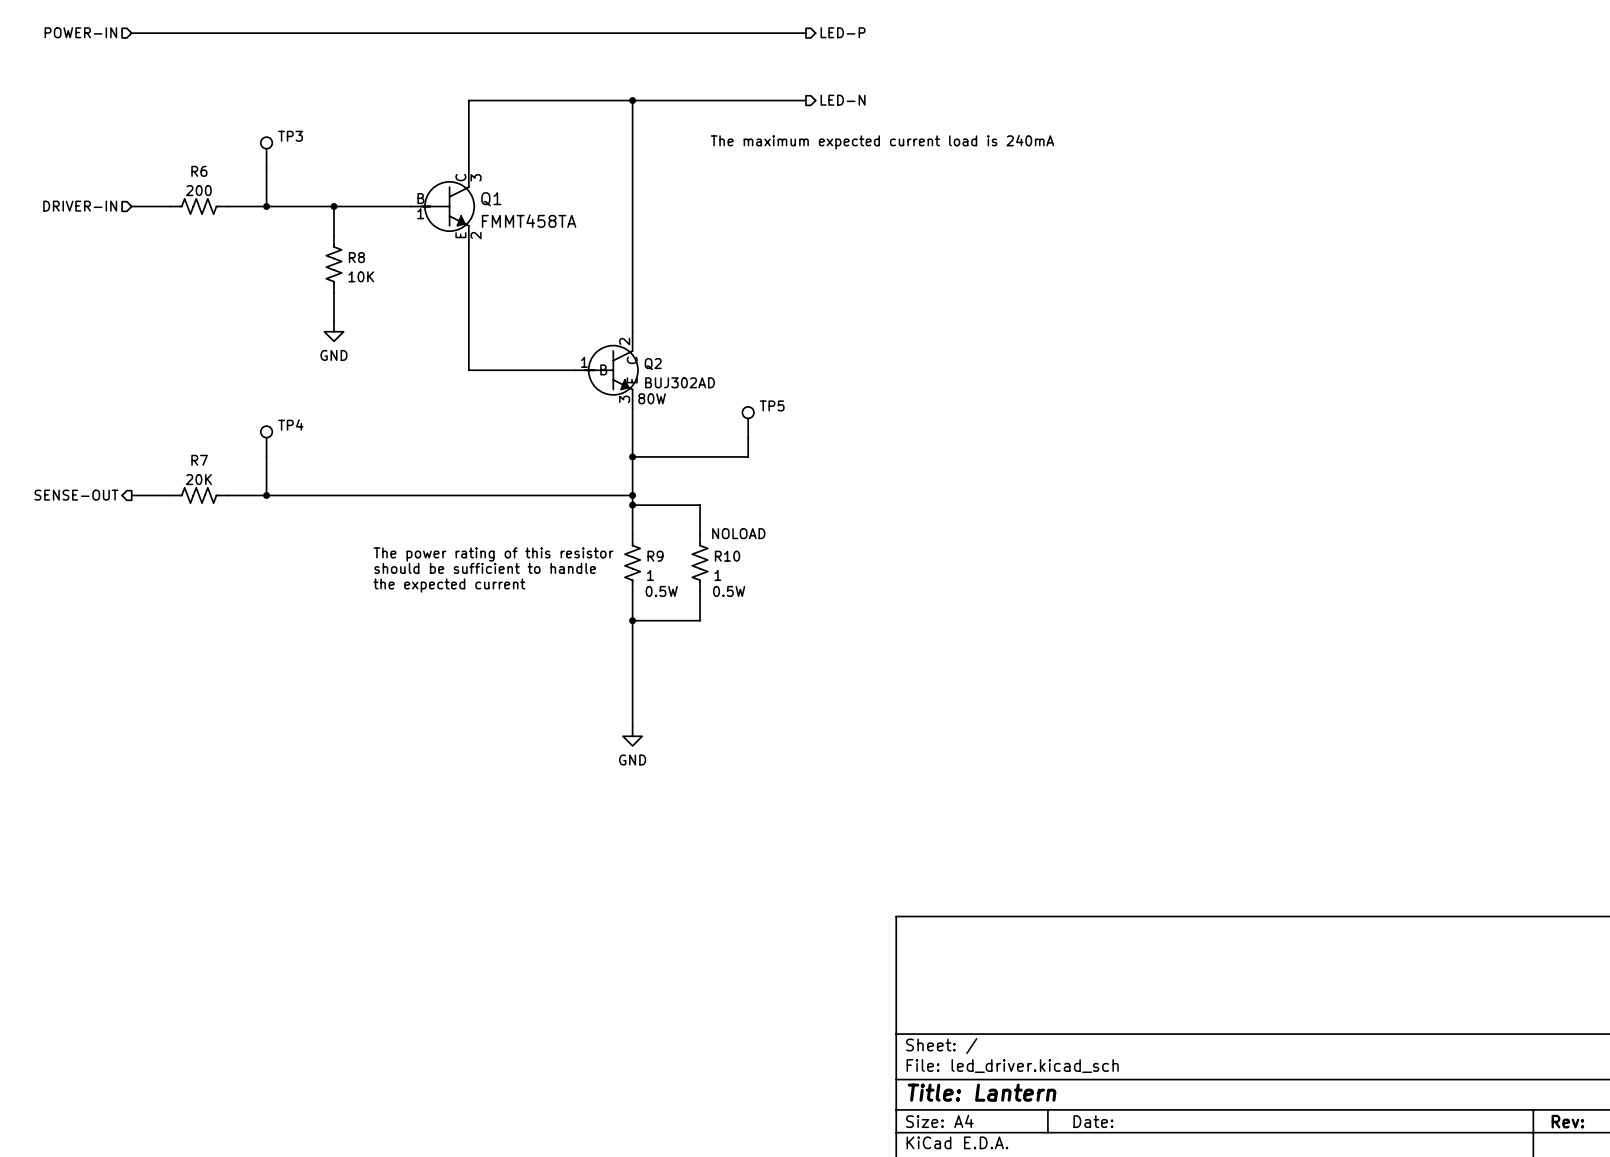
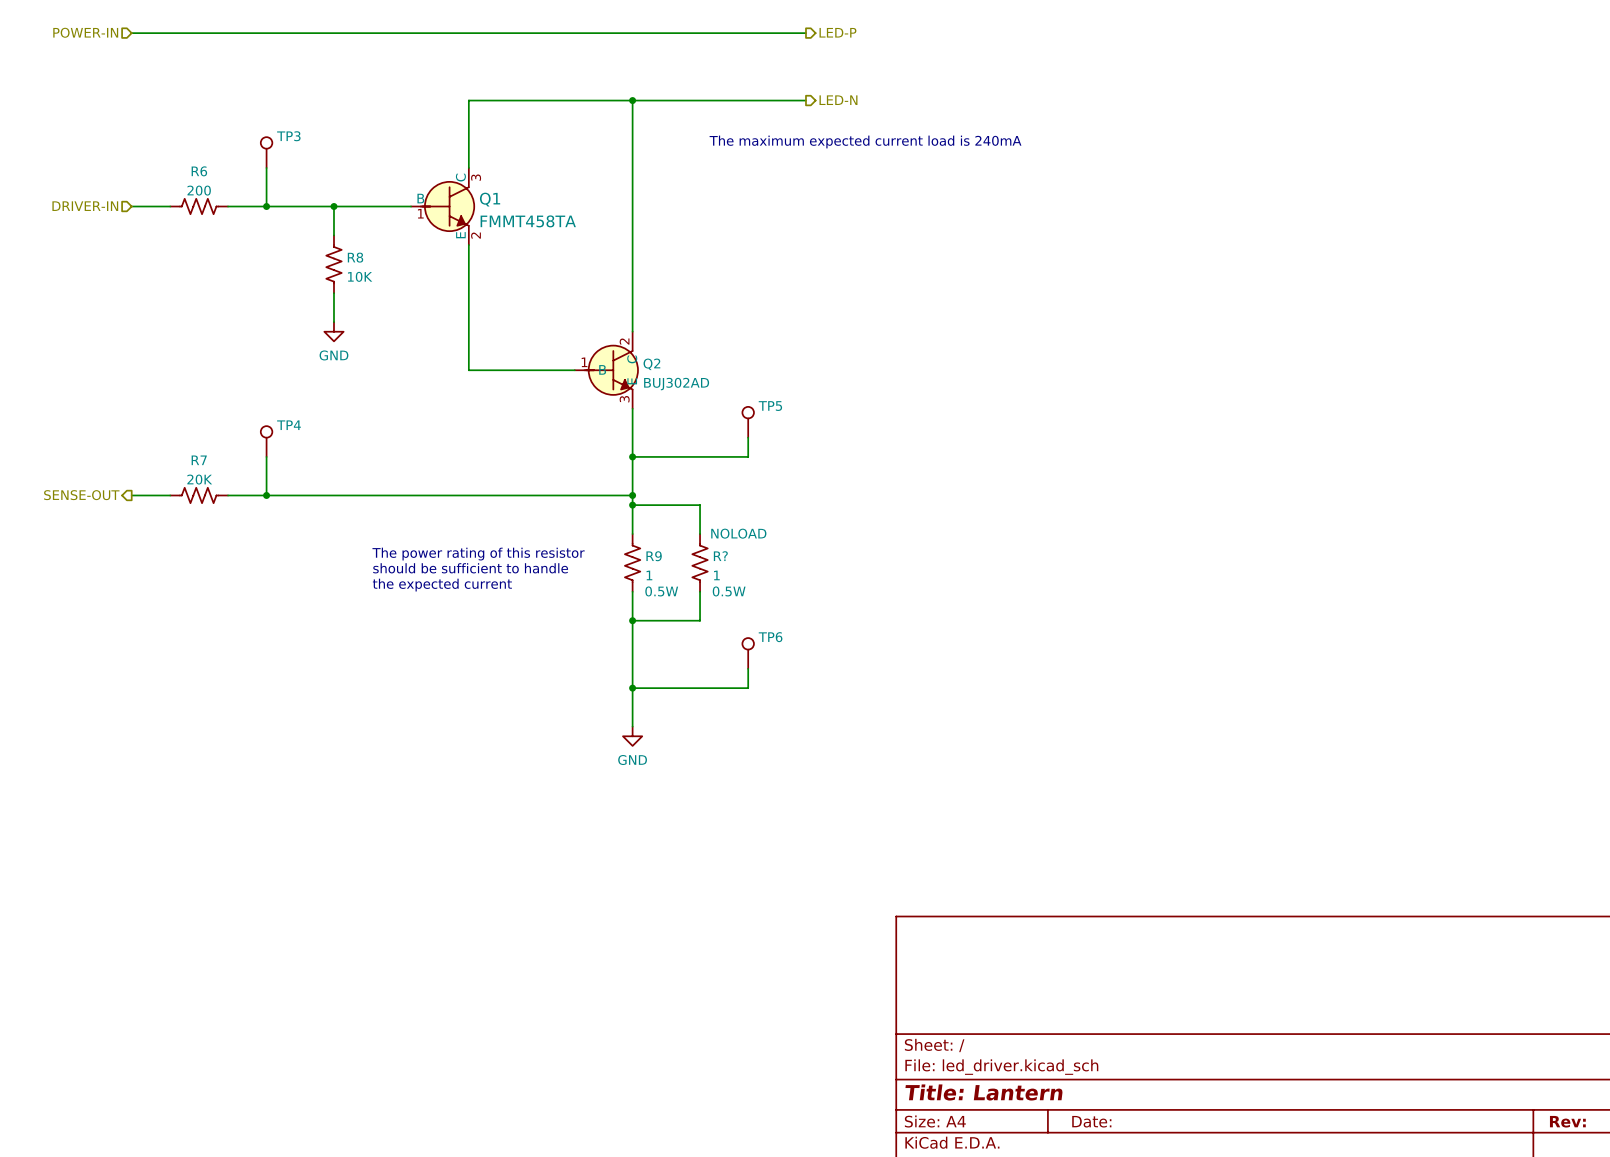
Q2 text: 80W (652, 398) -> none
R10 name: R10 (727, 556) -> R? (720, 556)
TP6: none -> (748, 653)
wire: none -> (748, 668) (748, 688) (632, 688)
junction: none -> (632, 688)

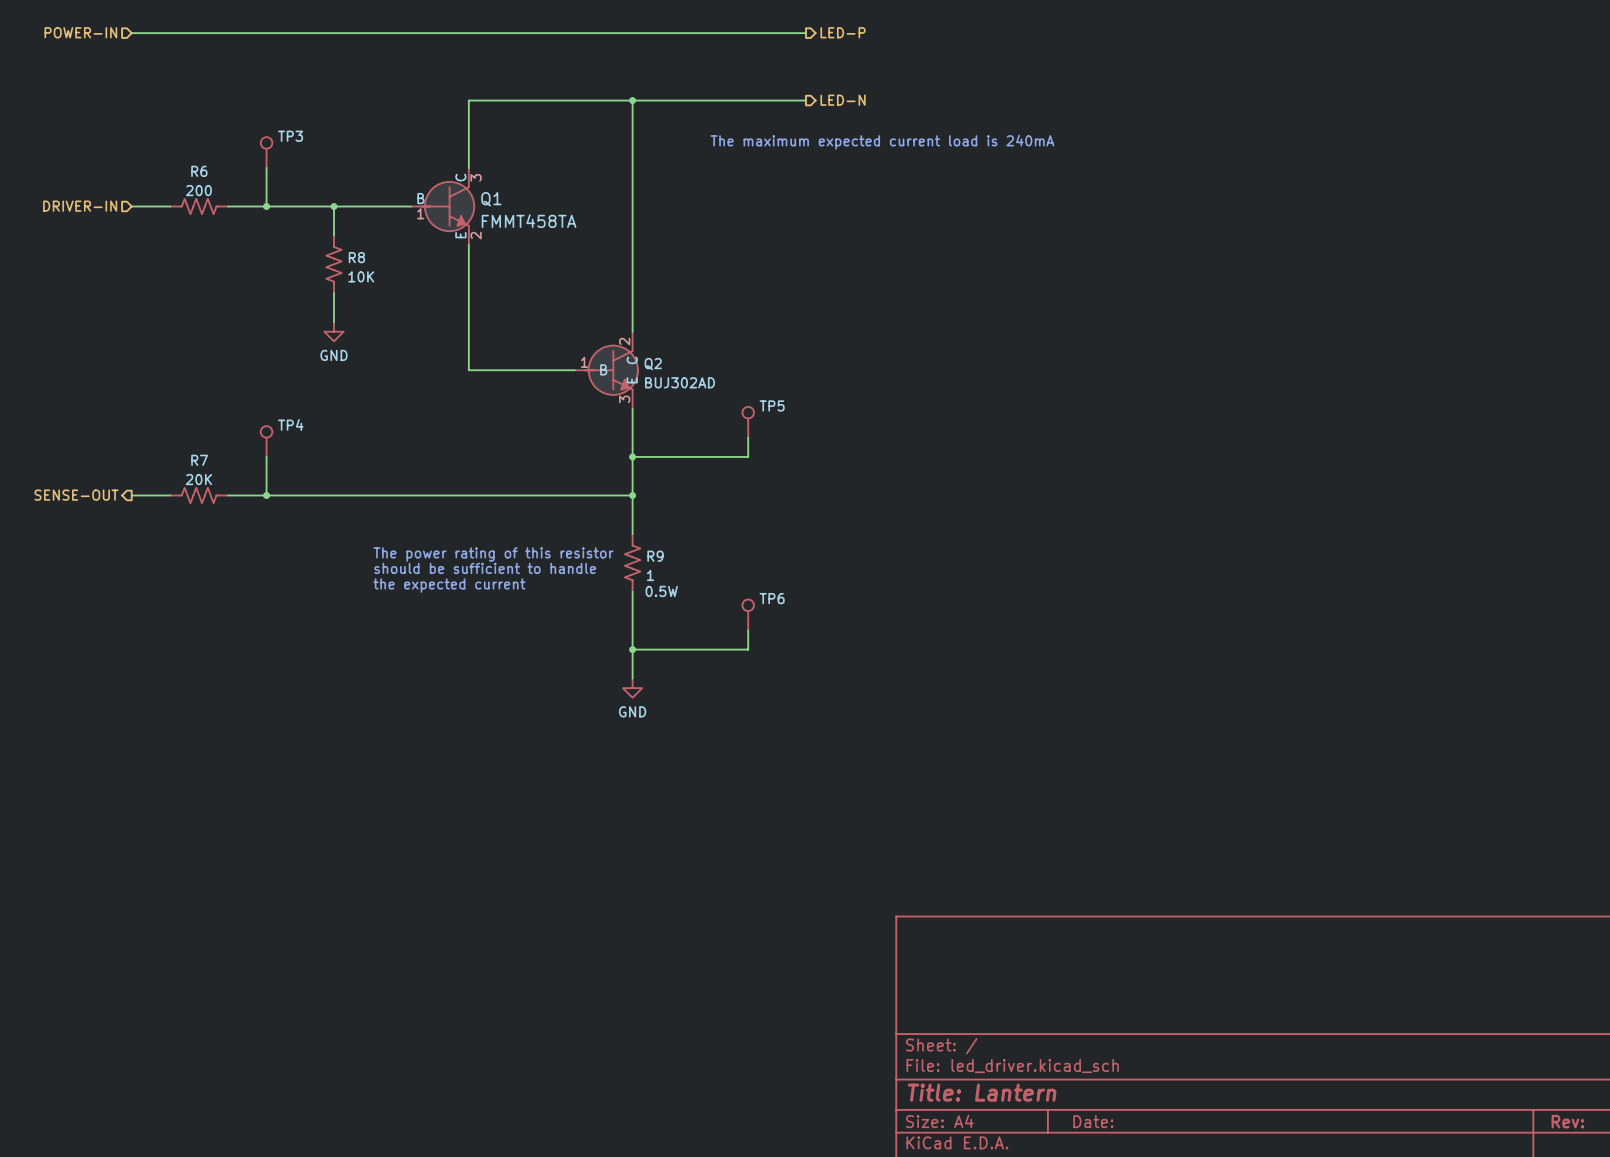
wire: (632, 505) (700, 505) (700, 534) -> none
junction: (632, 505) -> none
R?: 1 (700, 562) -> none
wire: (700, 591) (700, 620) (632, 620) -> none
junction: (632, 620) -> none
junction: none -> (632, 649)
TP6 position: (748, 653) -> (748, 614)
wire: (748, 668) (748, 688) (632, 688) -> (748, 630) (748, 649) (632, 649)
wire: (632, 678) (632, 726) -> none
junction: (632, 688) -> none
power symbol position: GND (632, 736) -> GND (632, 688)

